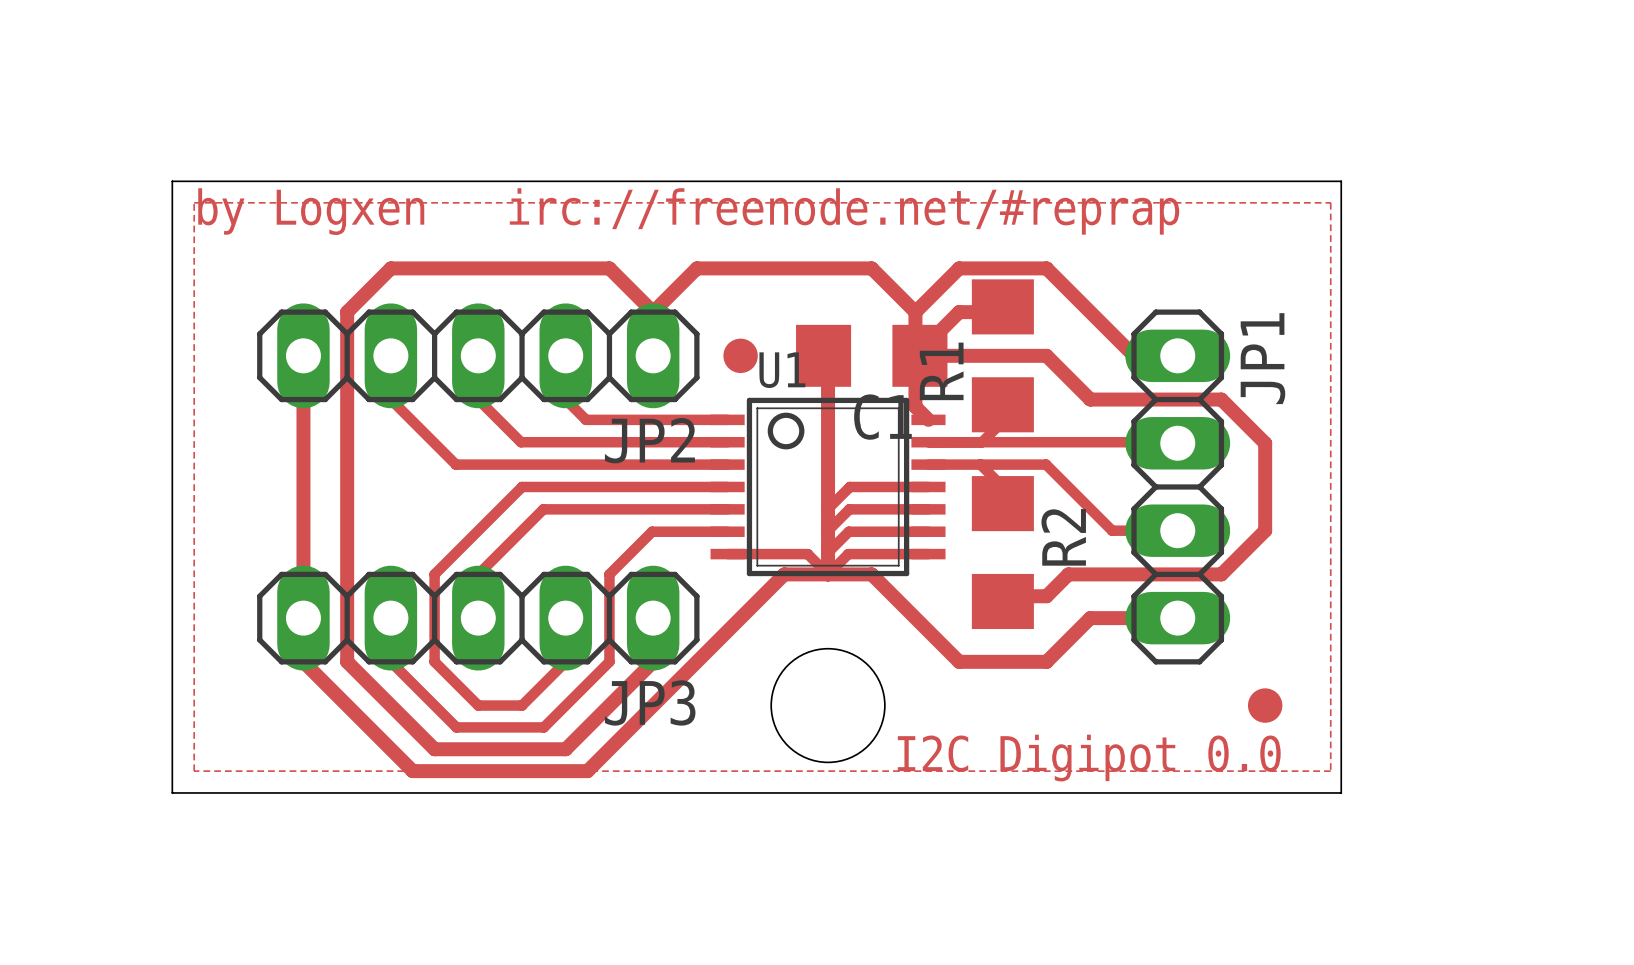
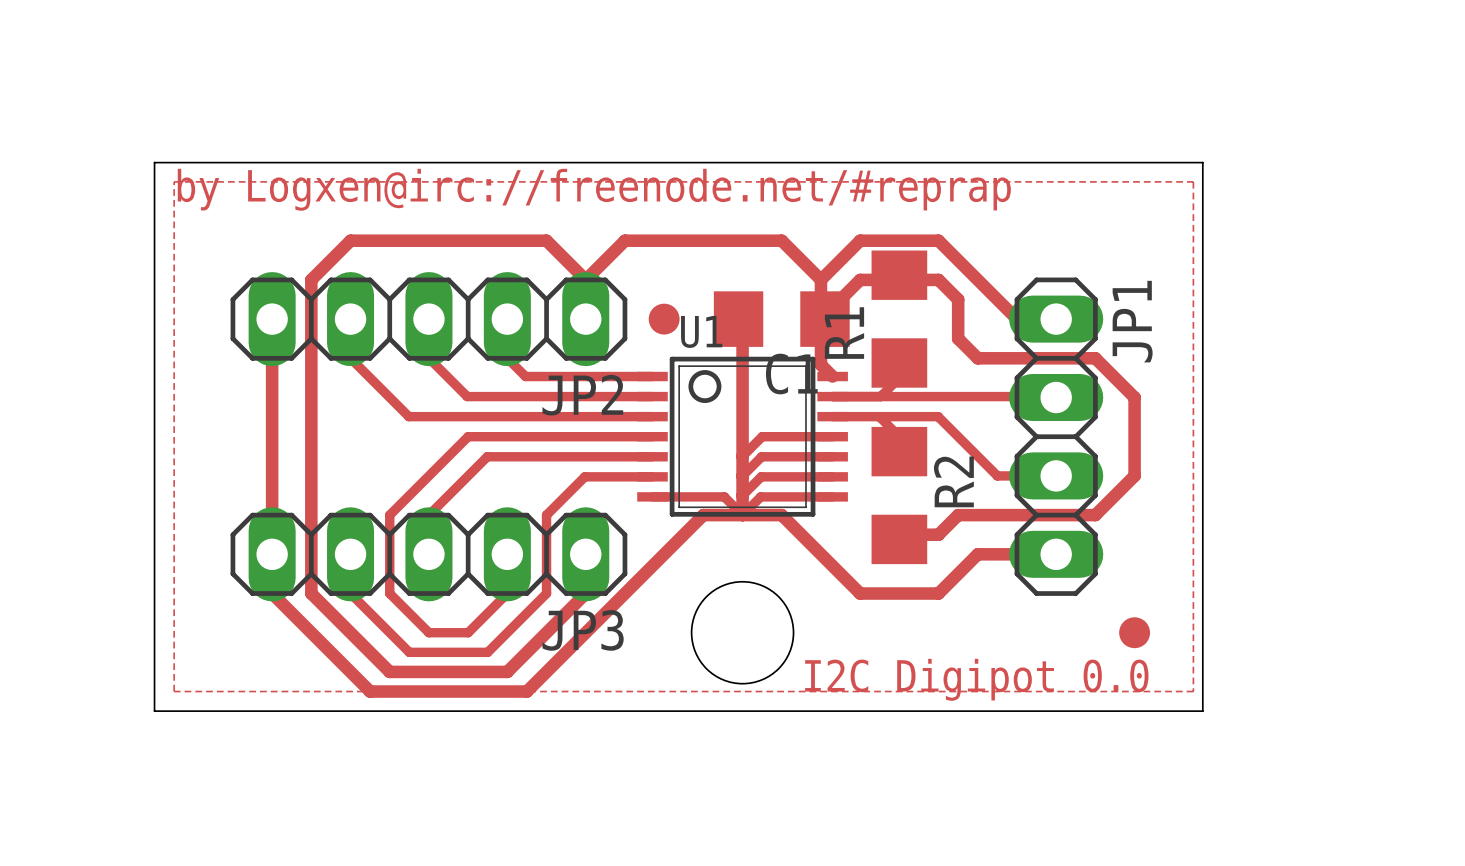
text: by Logxen irc://freenode.net/#reprap (688, 211) -> by Logxen@irc://freenode.net/#reprap (594, 189)
track: (919, 355) (1046, 355) (1068, 377) -> (899, 279) (938, 279) (958, 299) (958, 338)

